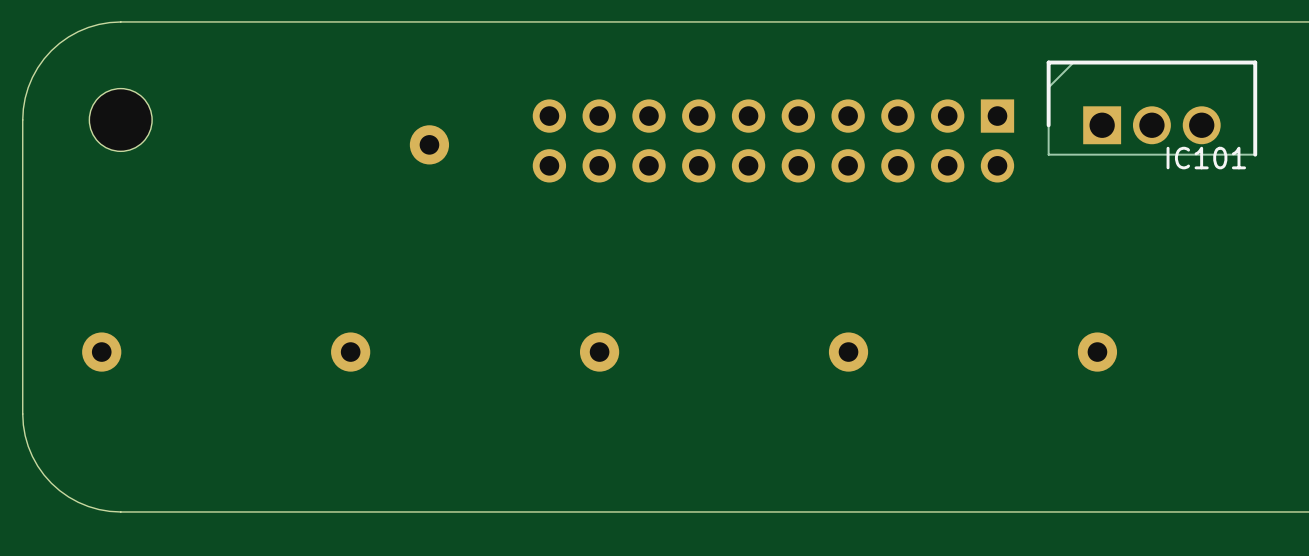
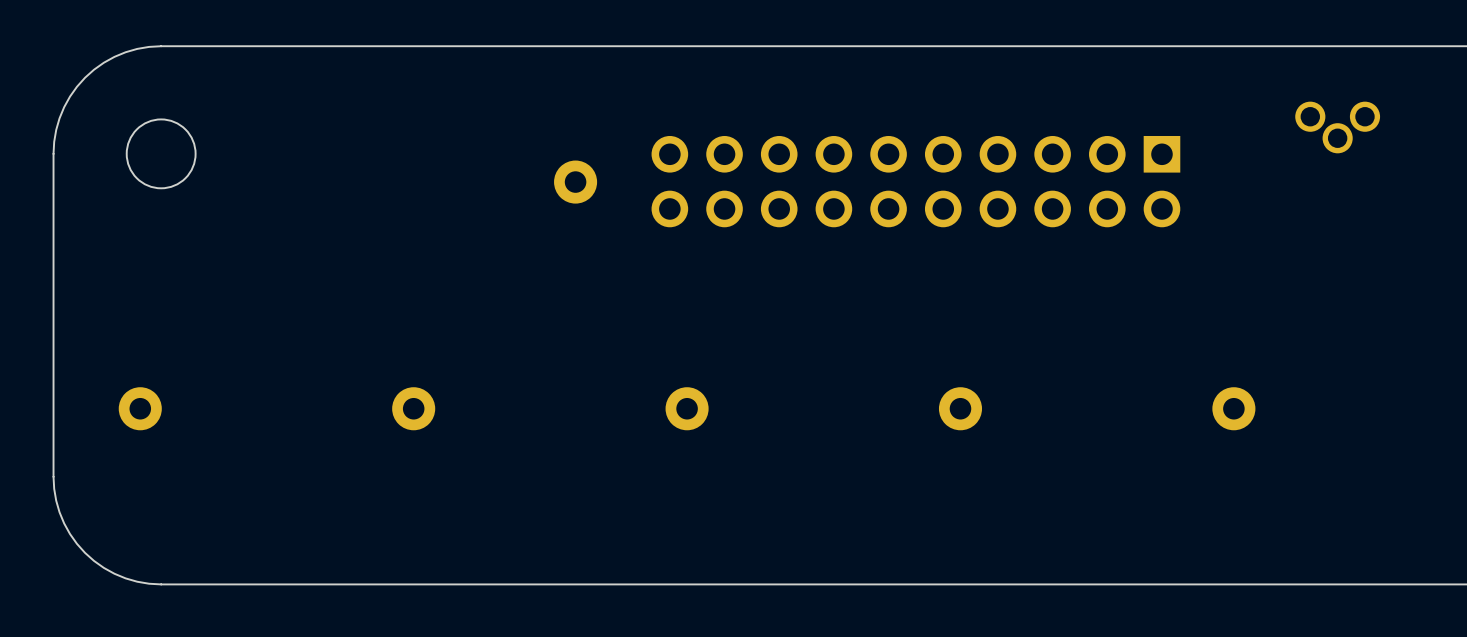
part: none -> (1337, 127)
IC101: (1151, 108) -> none
part position: (773, 140) -> (915, 181)
part position: (429, 144) -> (575, 182)

